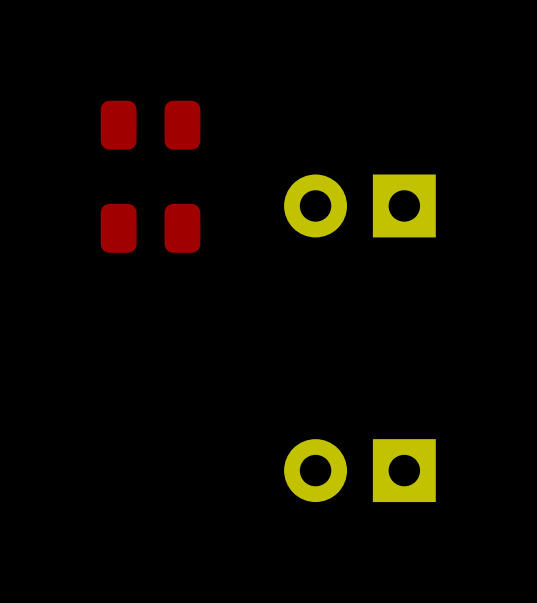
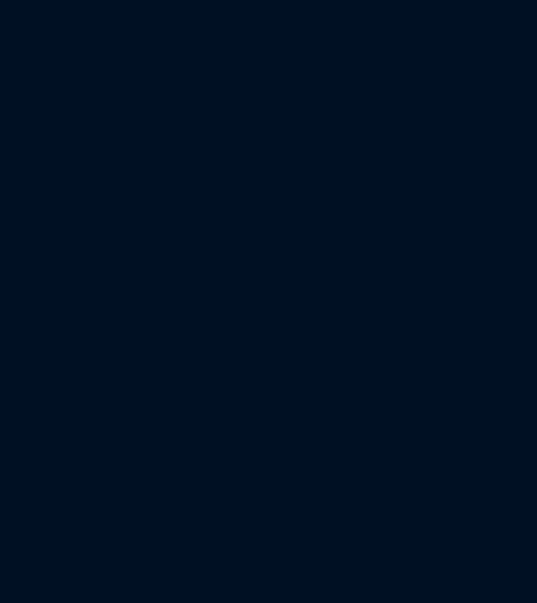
part: (150, 125) -> none
part: (359, 205) -> none
part: (150, 228) -> none
part: (359, 470) -> none

